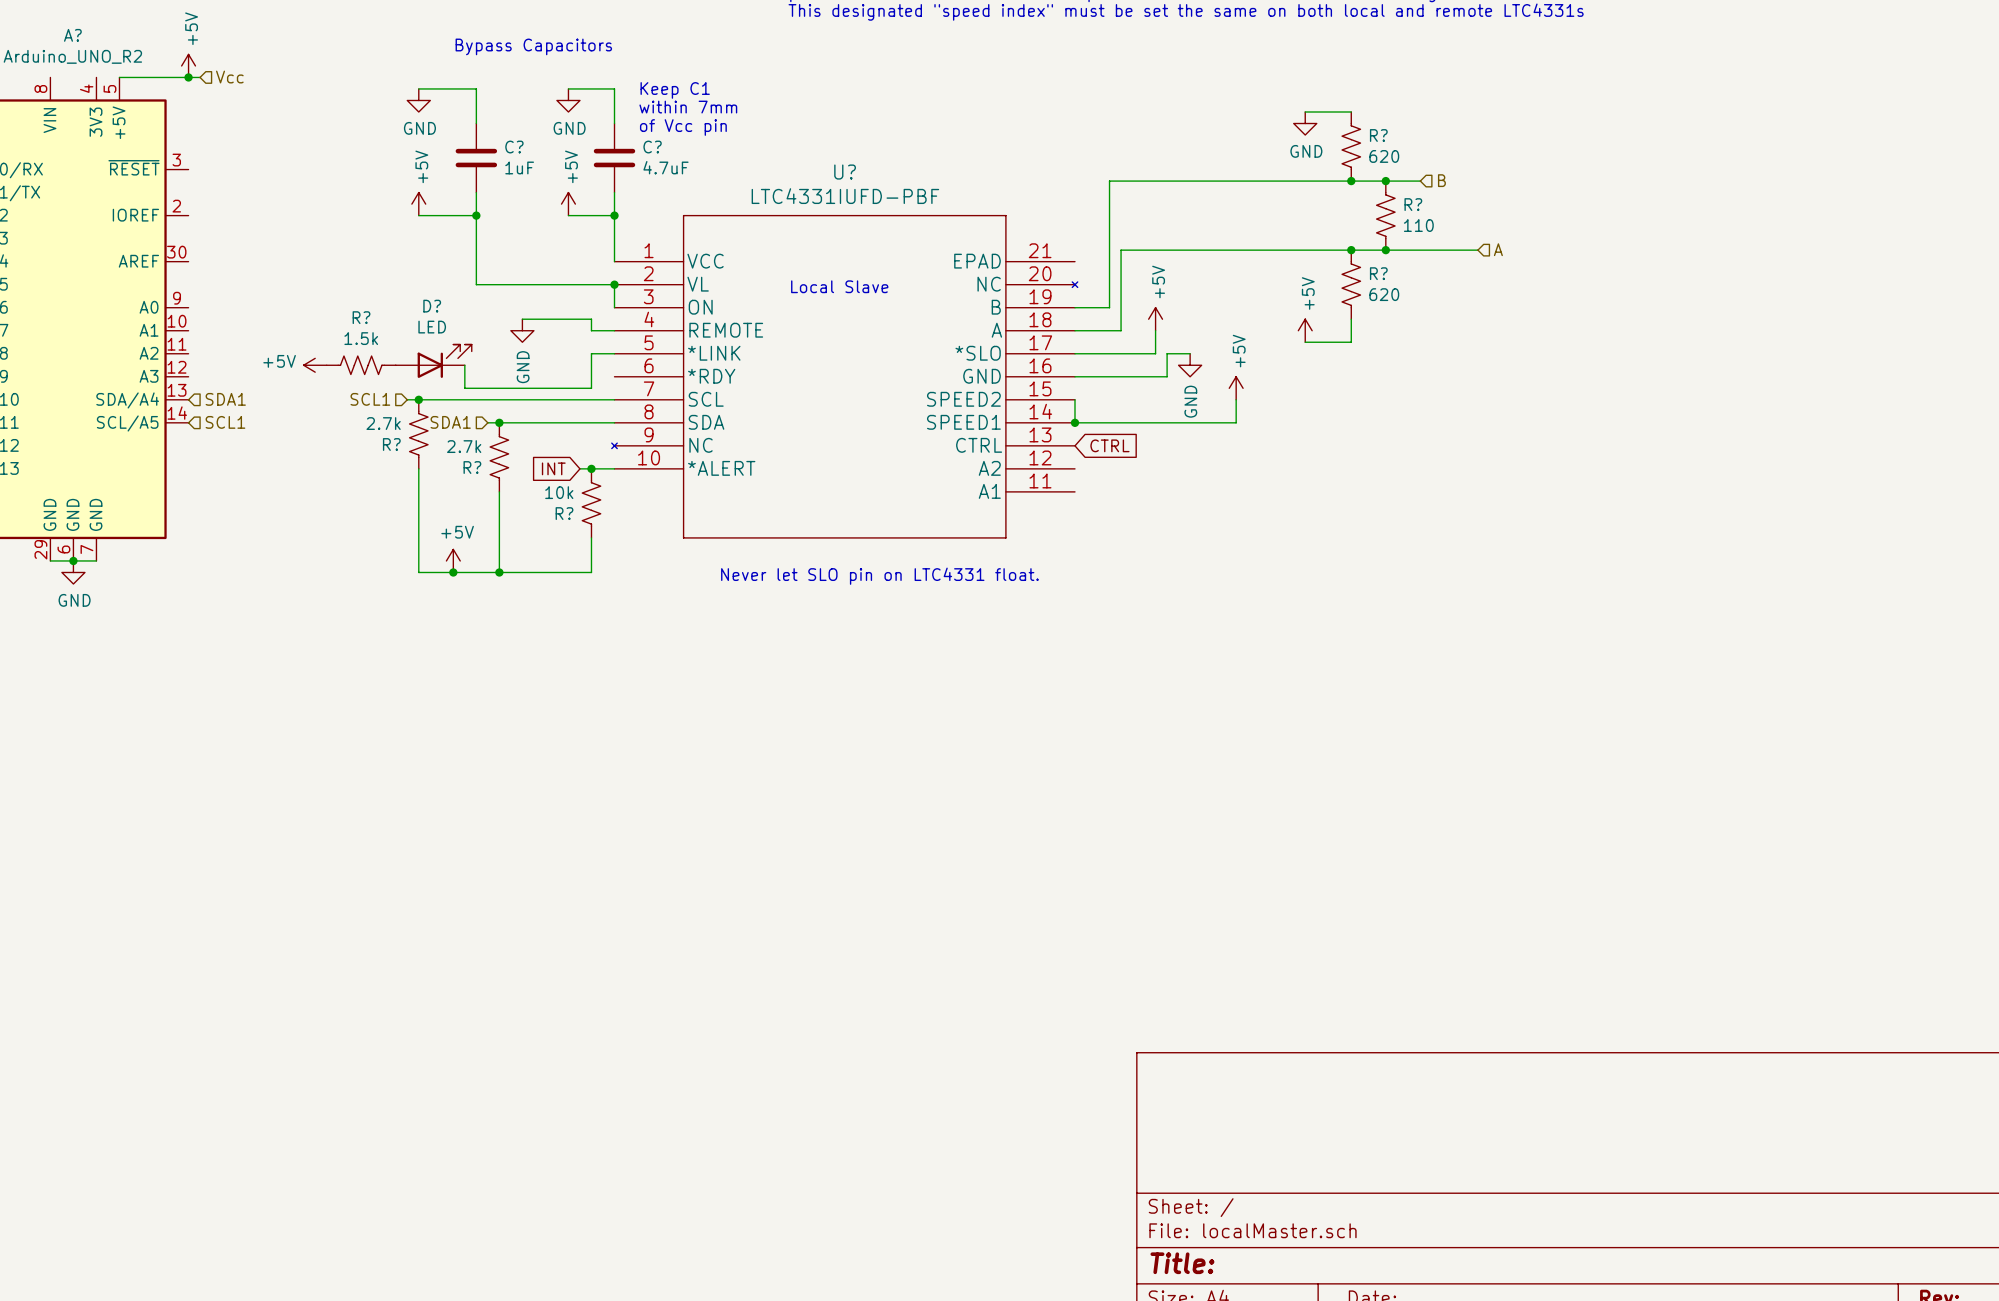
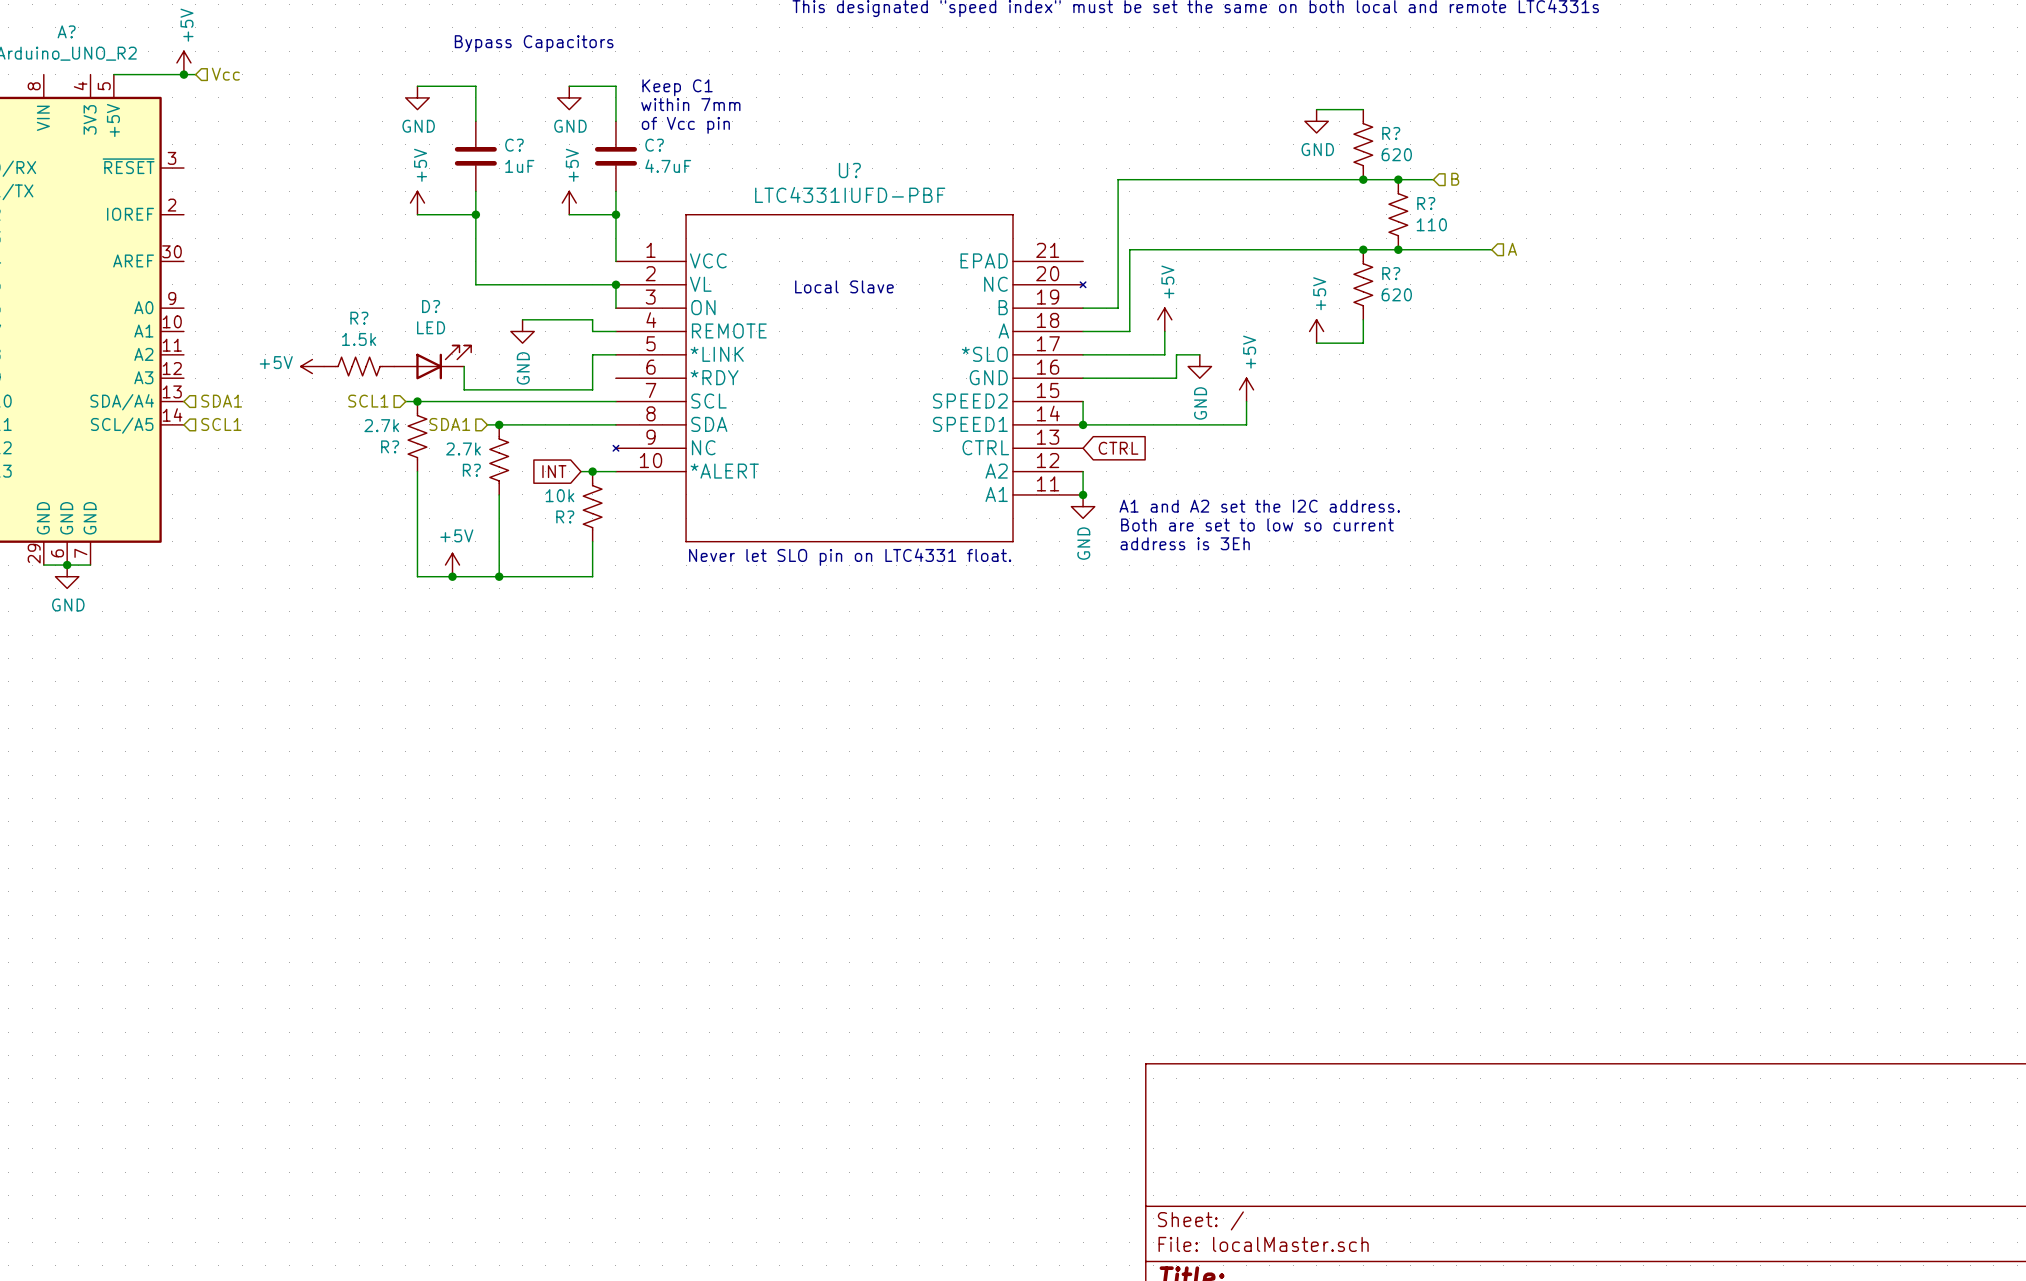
wire: none -> (1083, 471) (1083, 494)
junction: none -> (1083, 494)
text: none -> A1 and A2 set the I2C address. (1259, 506)
power symbol: none -> GND (1083, 506)
text: none -> Both are set to low so current (1257, 524)
text: none -> address is 3Eh (1185, 543)
text position: Never let SLO pin on LTC4331 float. (879, 576) -> Never let SLO pin on LTC4331 float. (850, 557)

